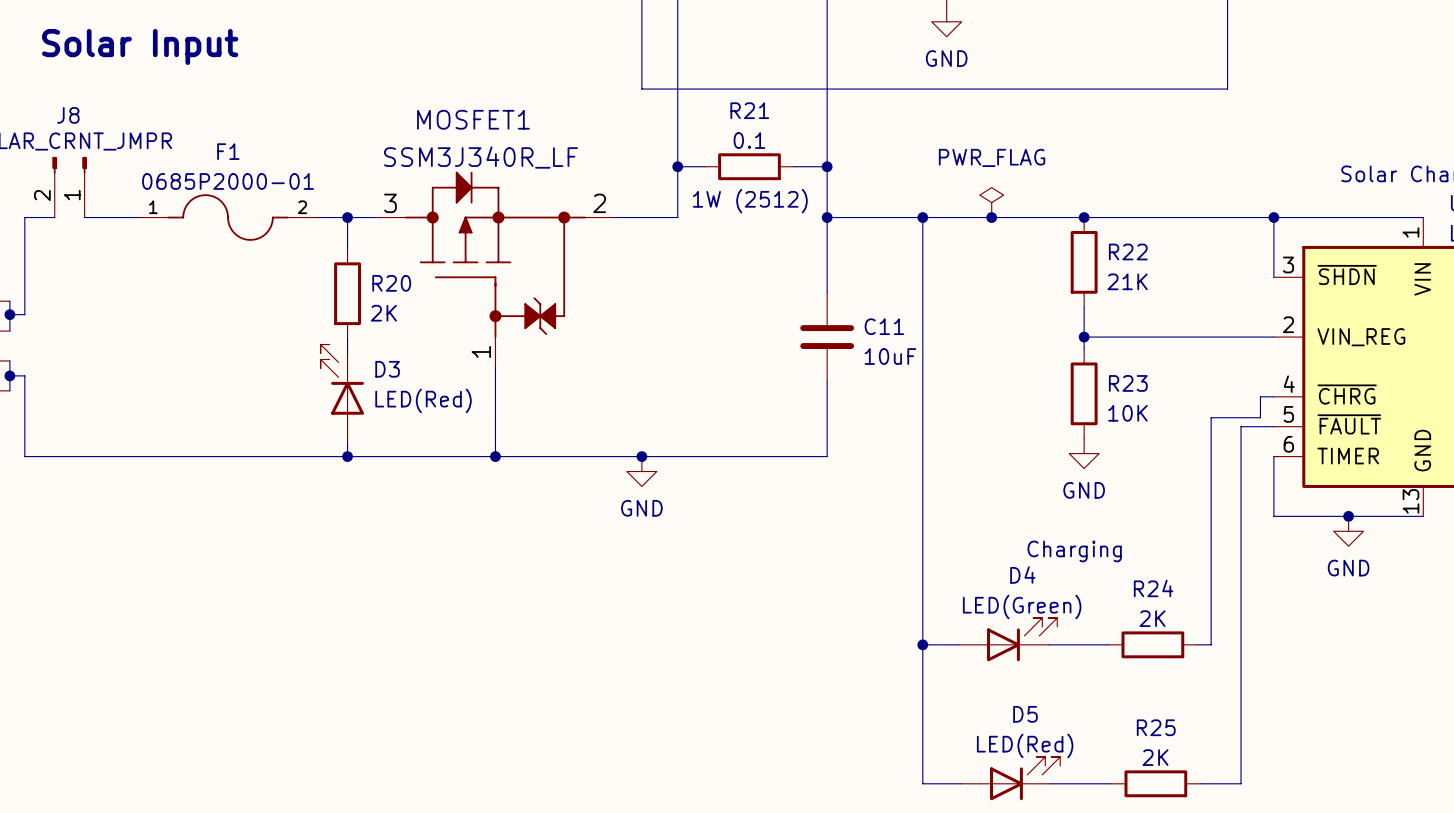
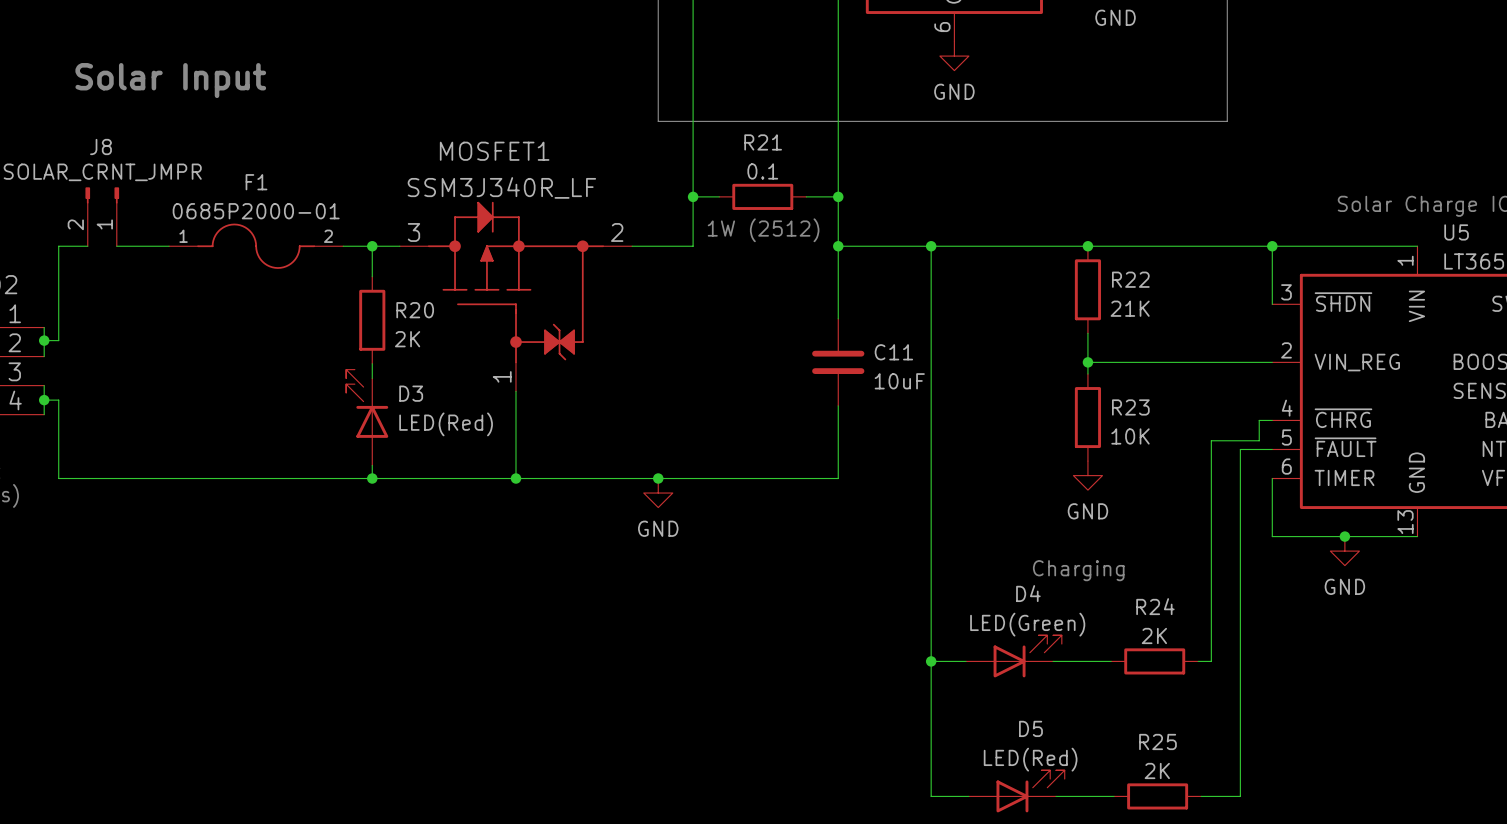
power symbol: PWR_FLAG (991, 202) -> none
junction: (991, 217) -> none

